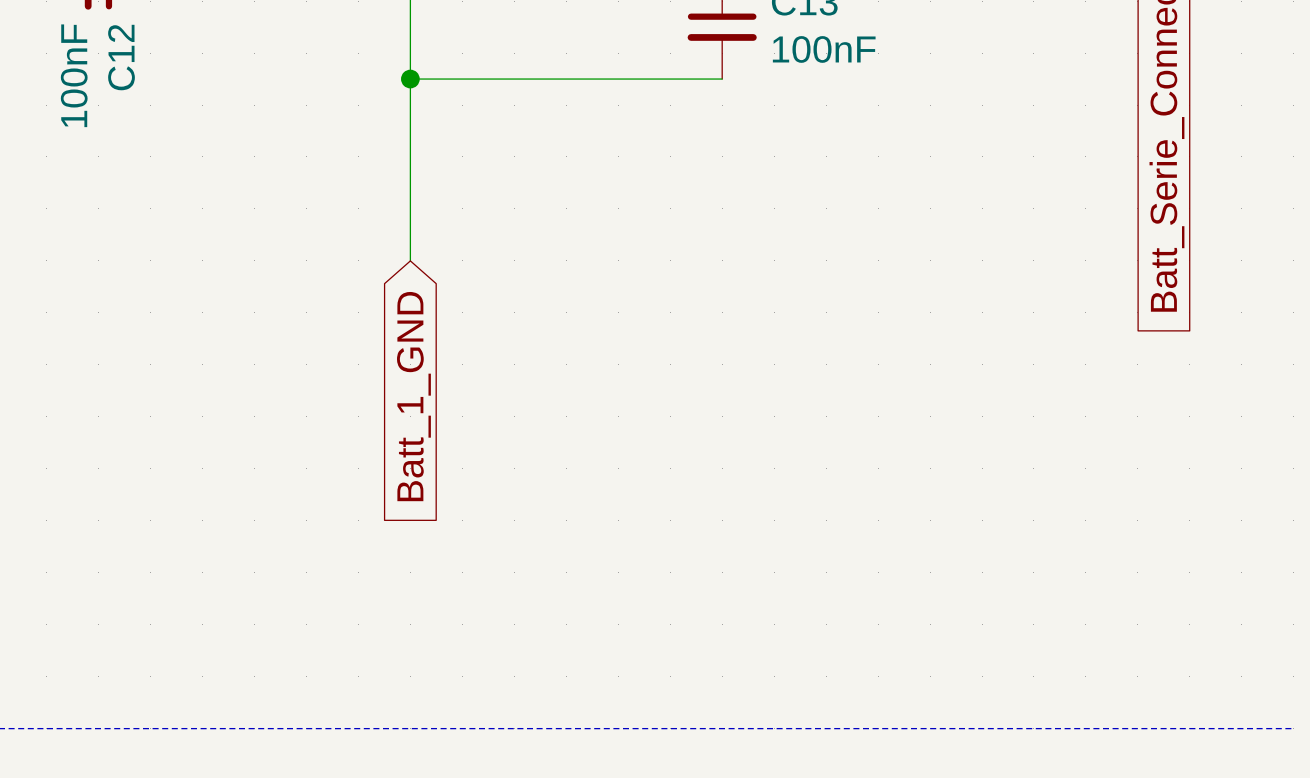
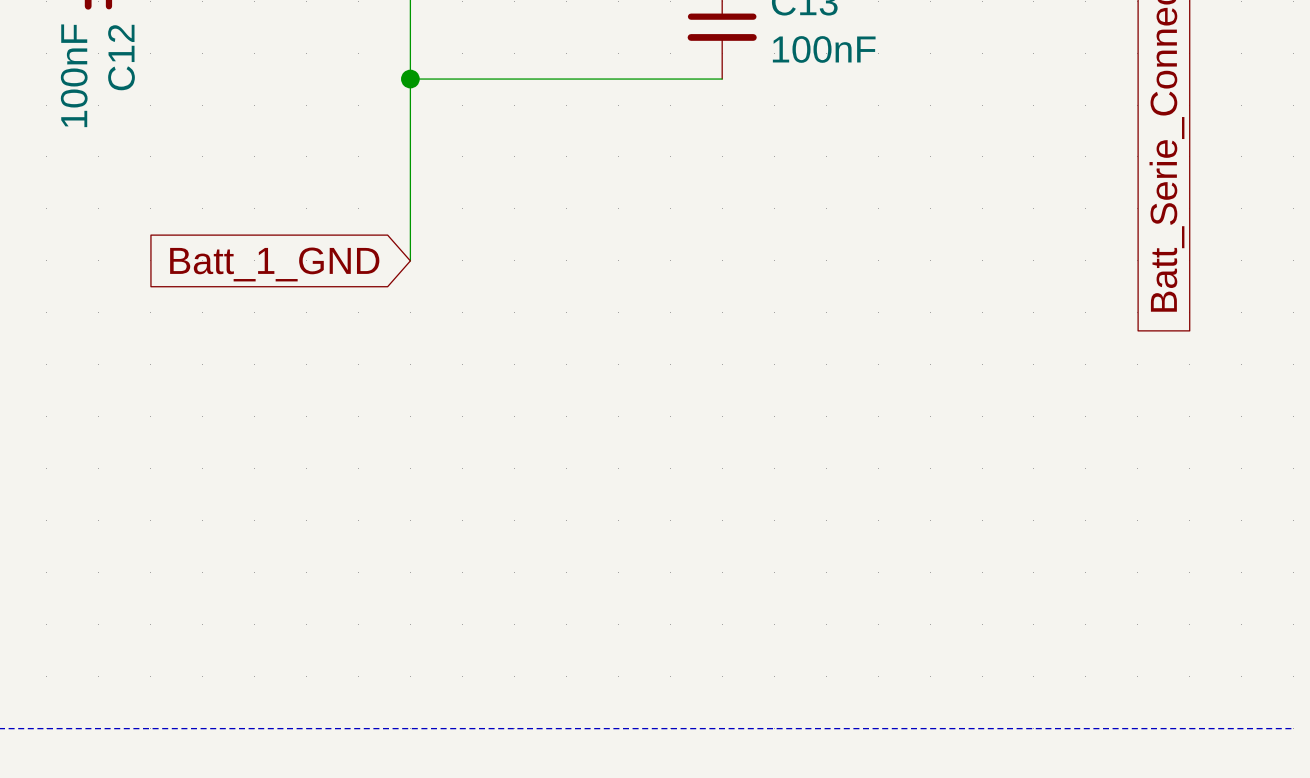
global label rotation: 0° (413, 396) -> 90° clockwise (274, 264)

